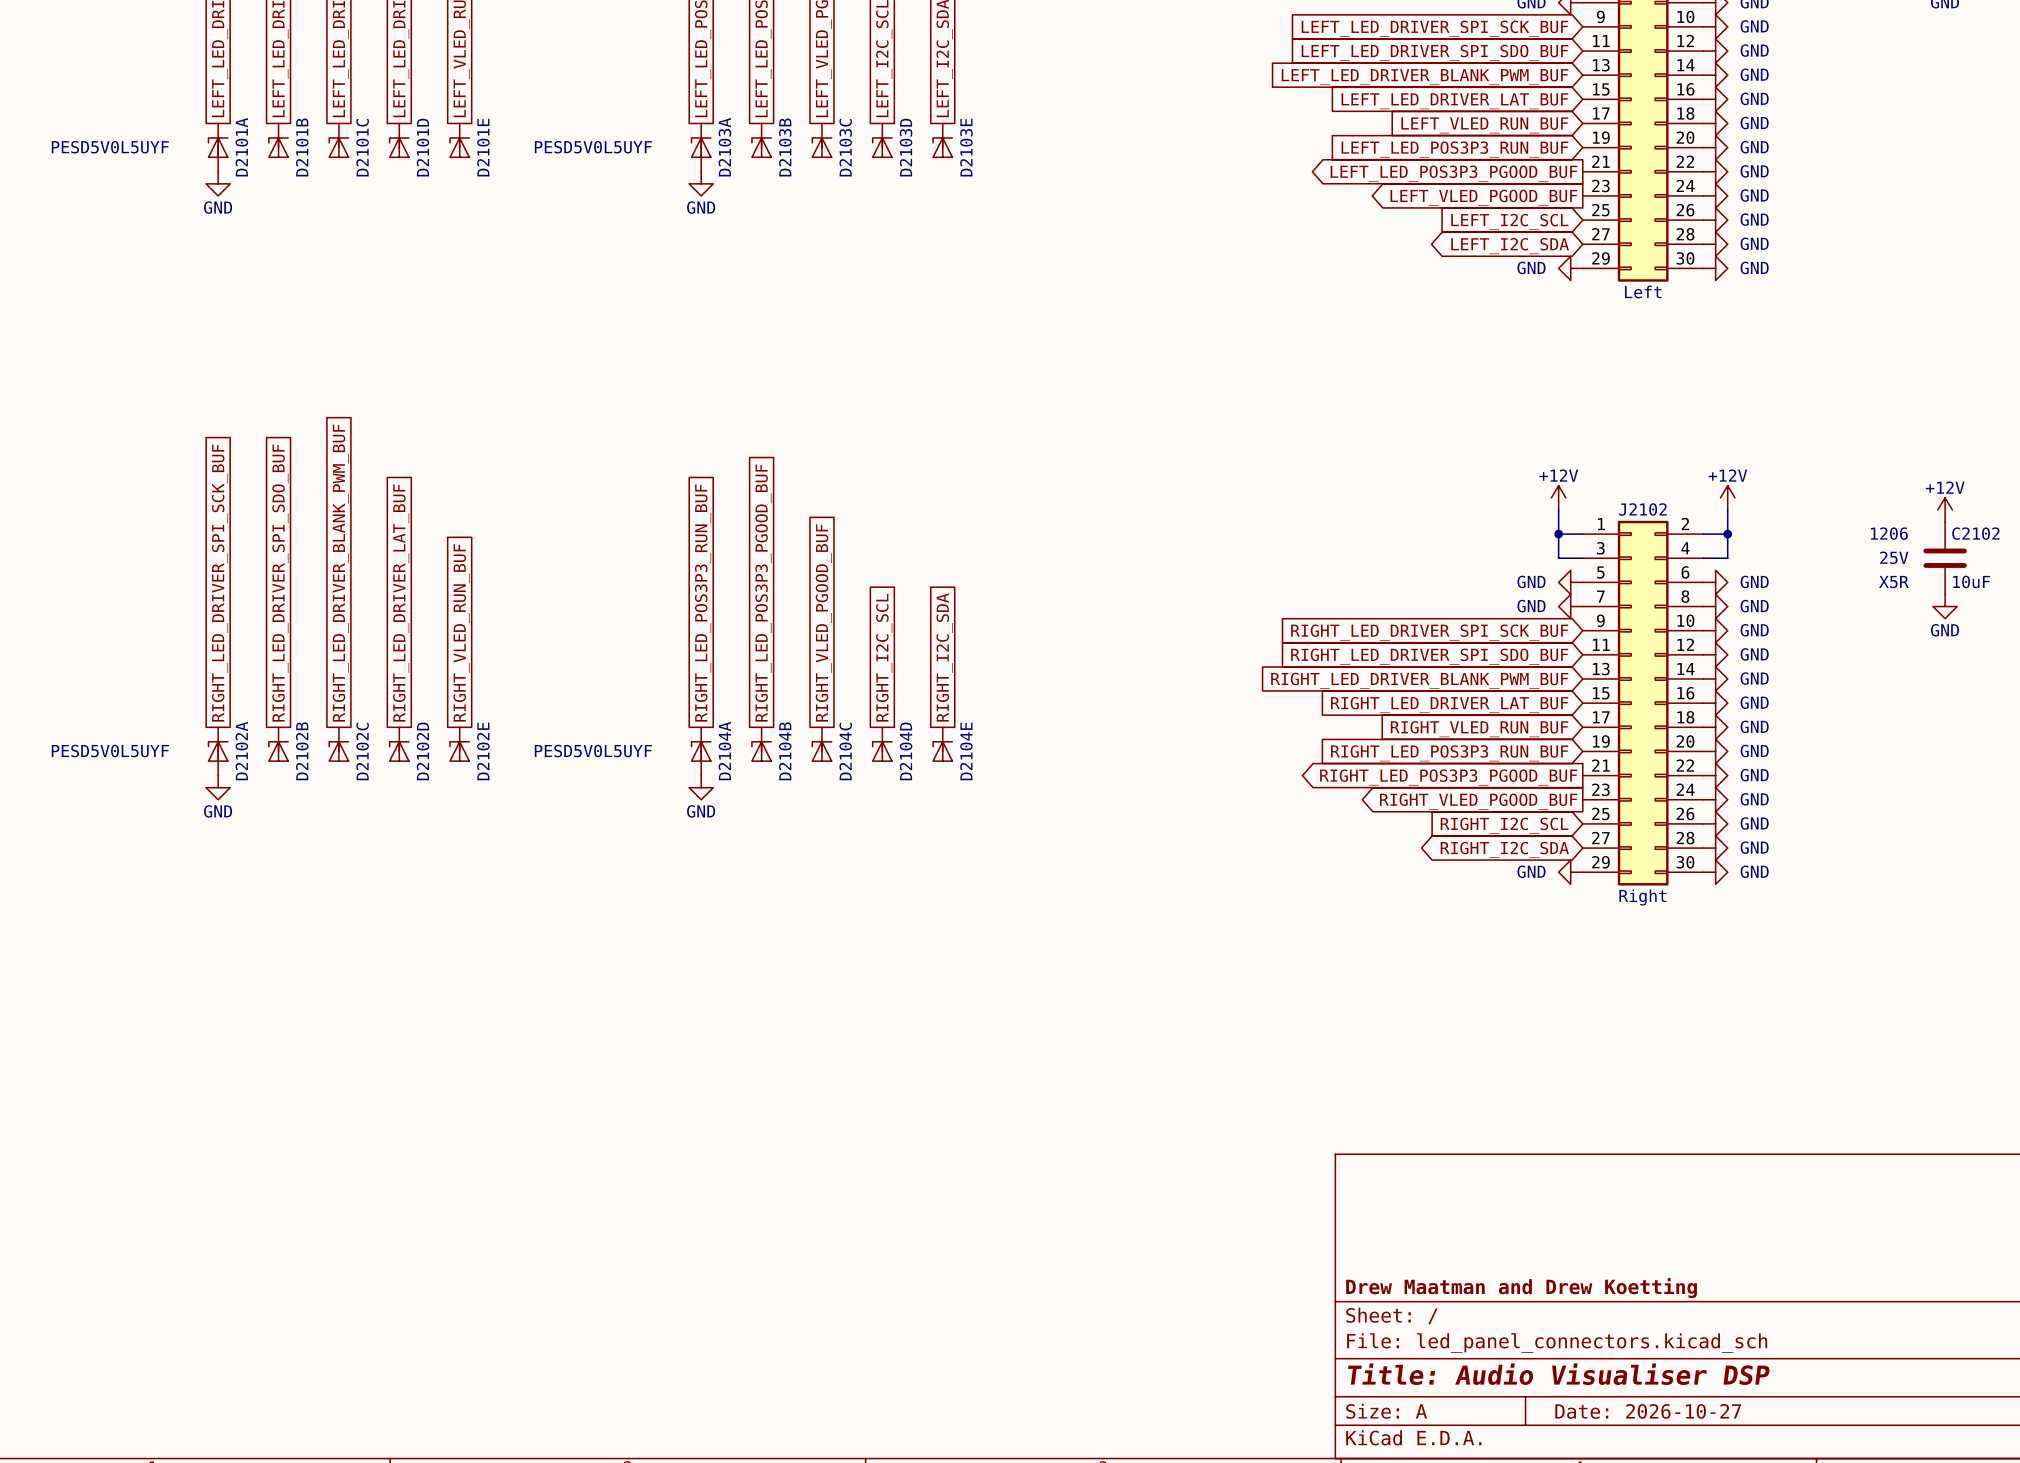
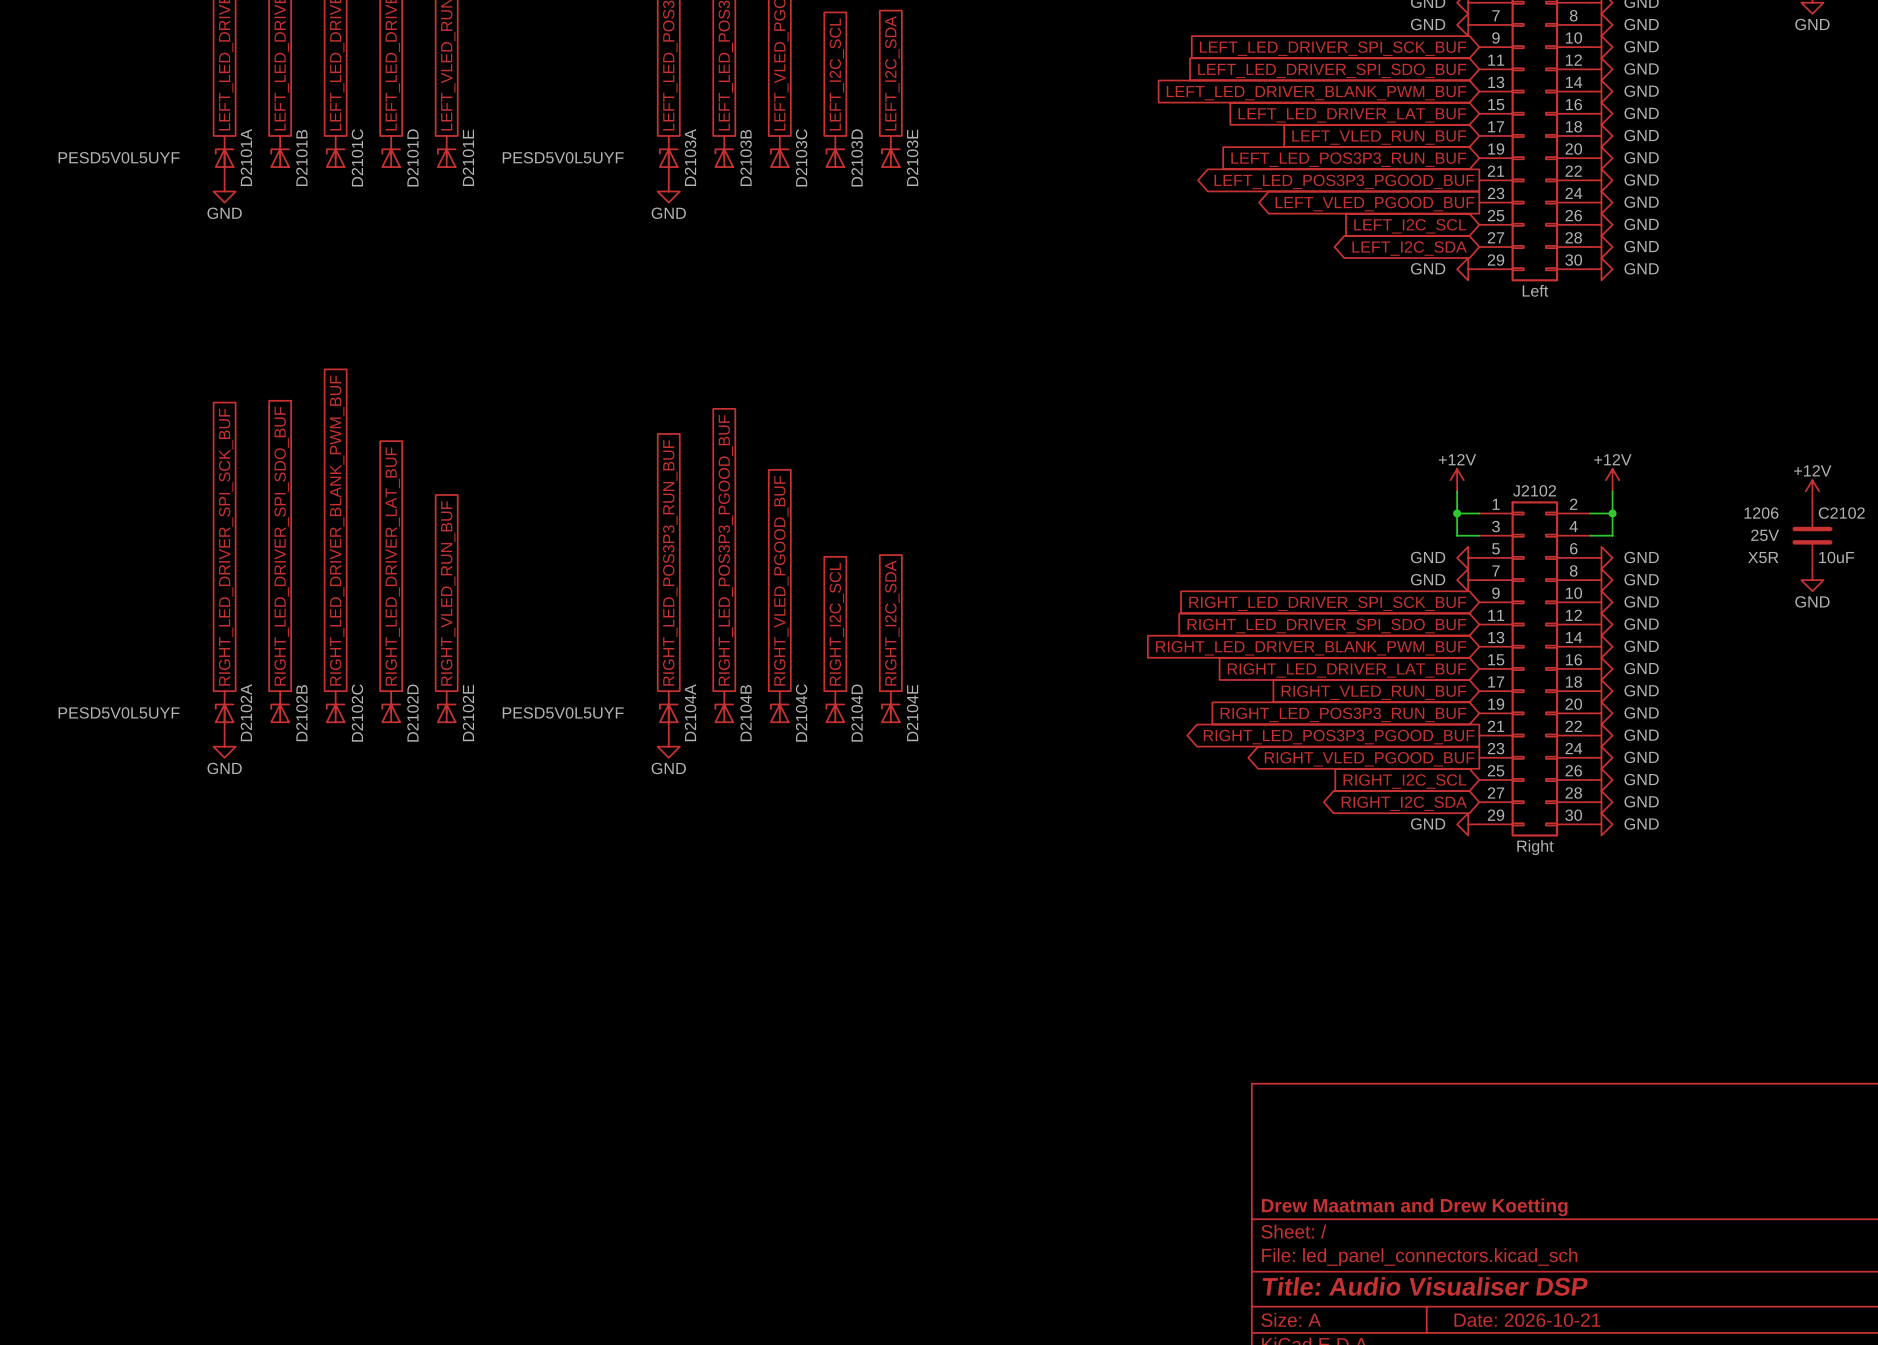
title block: Date: 2026-10-27 (1648, 1411) -> Date: 2026-10-21 (1527, 1320)

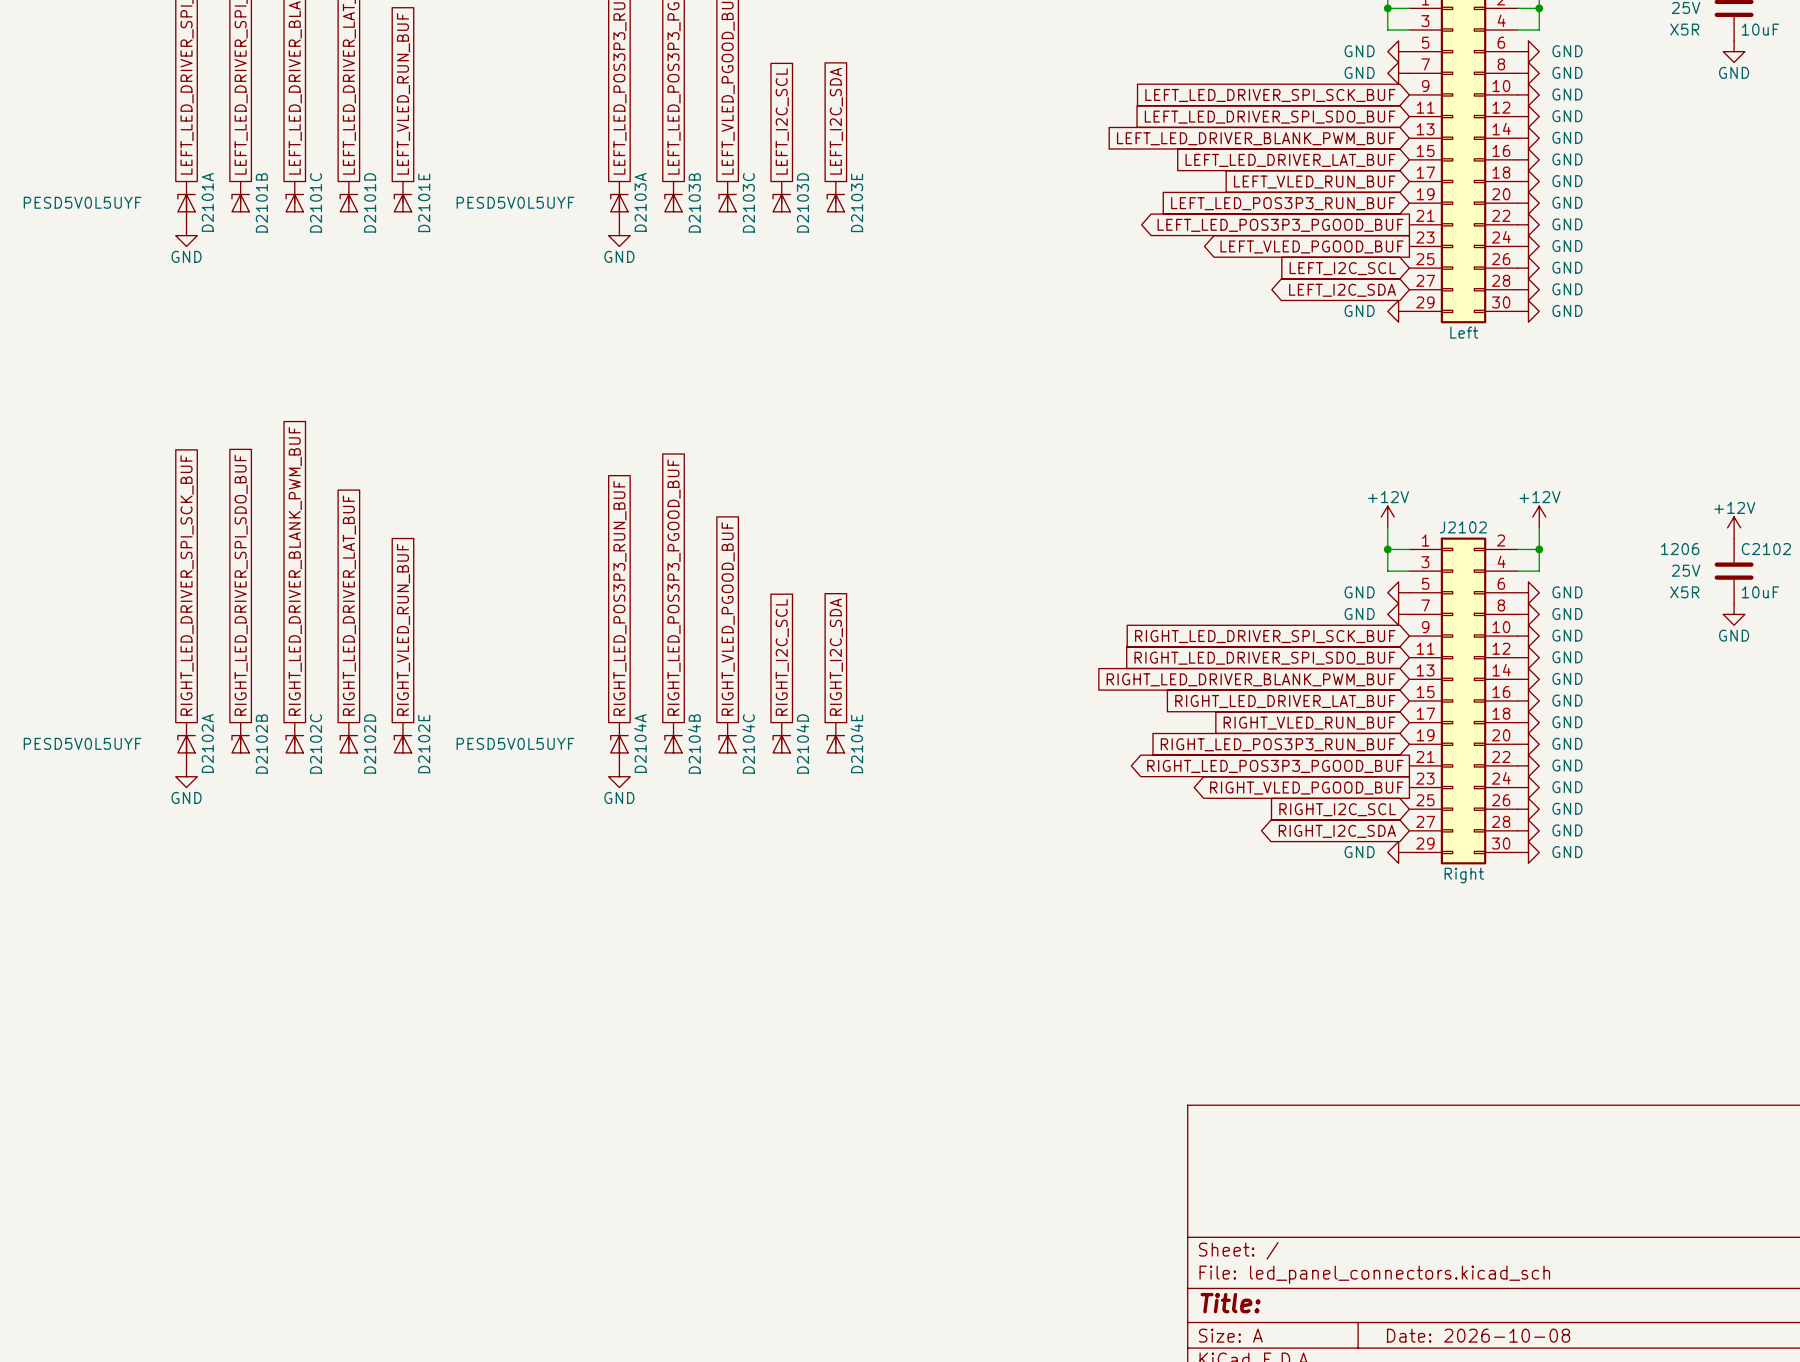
title block: Drew Maatman and Drew Koetting (1414, 1207) -> none
title block: Title: Audio Visualiser DSP (1425, 1286) -> Title: (1230, 1303)
title block: Date: 2026-10-21 (1527, 1320) -> Date: 2026-10-08 (1478, 1335)

